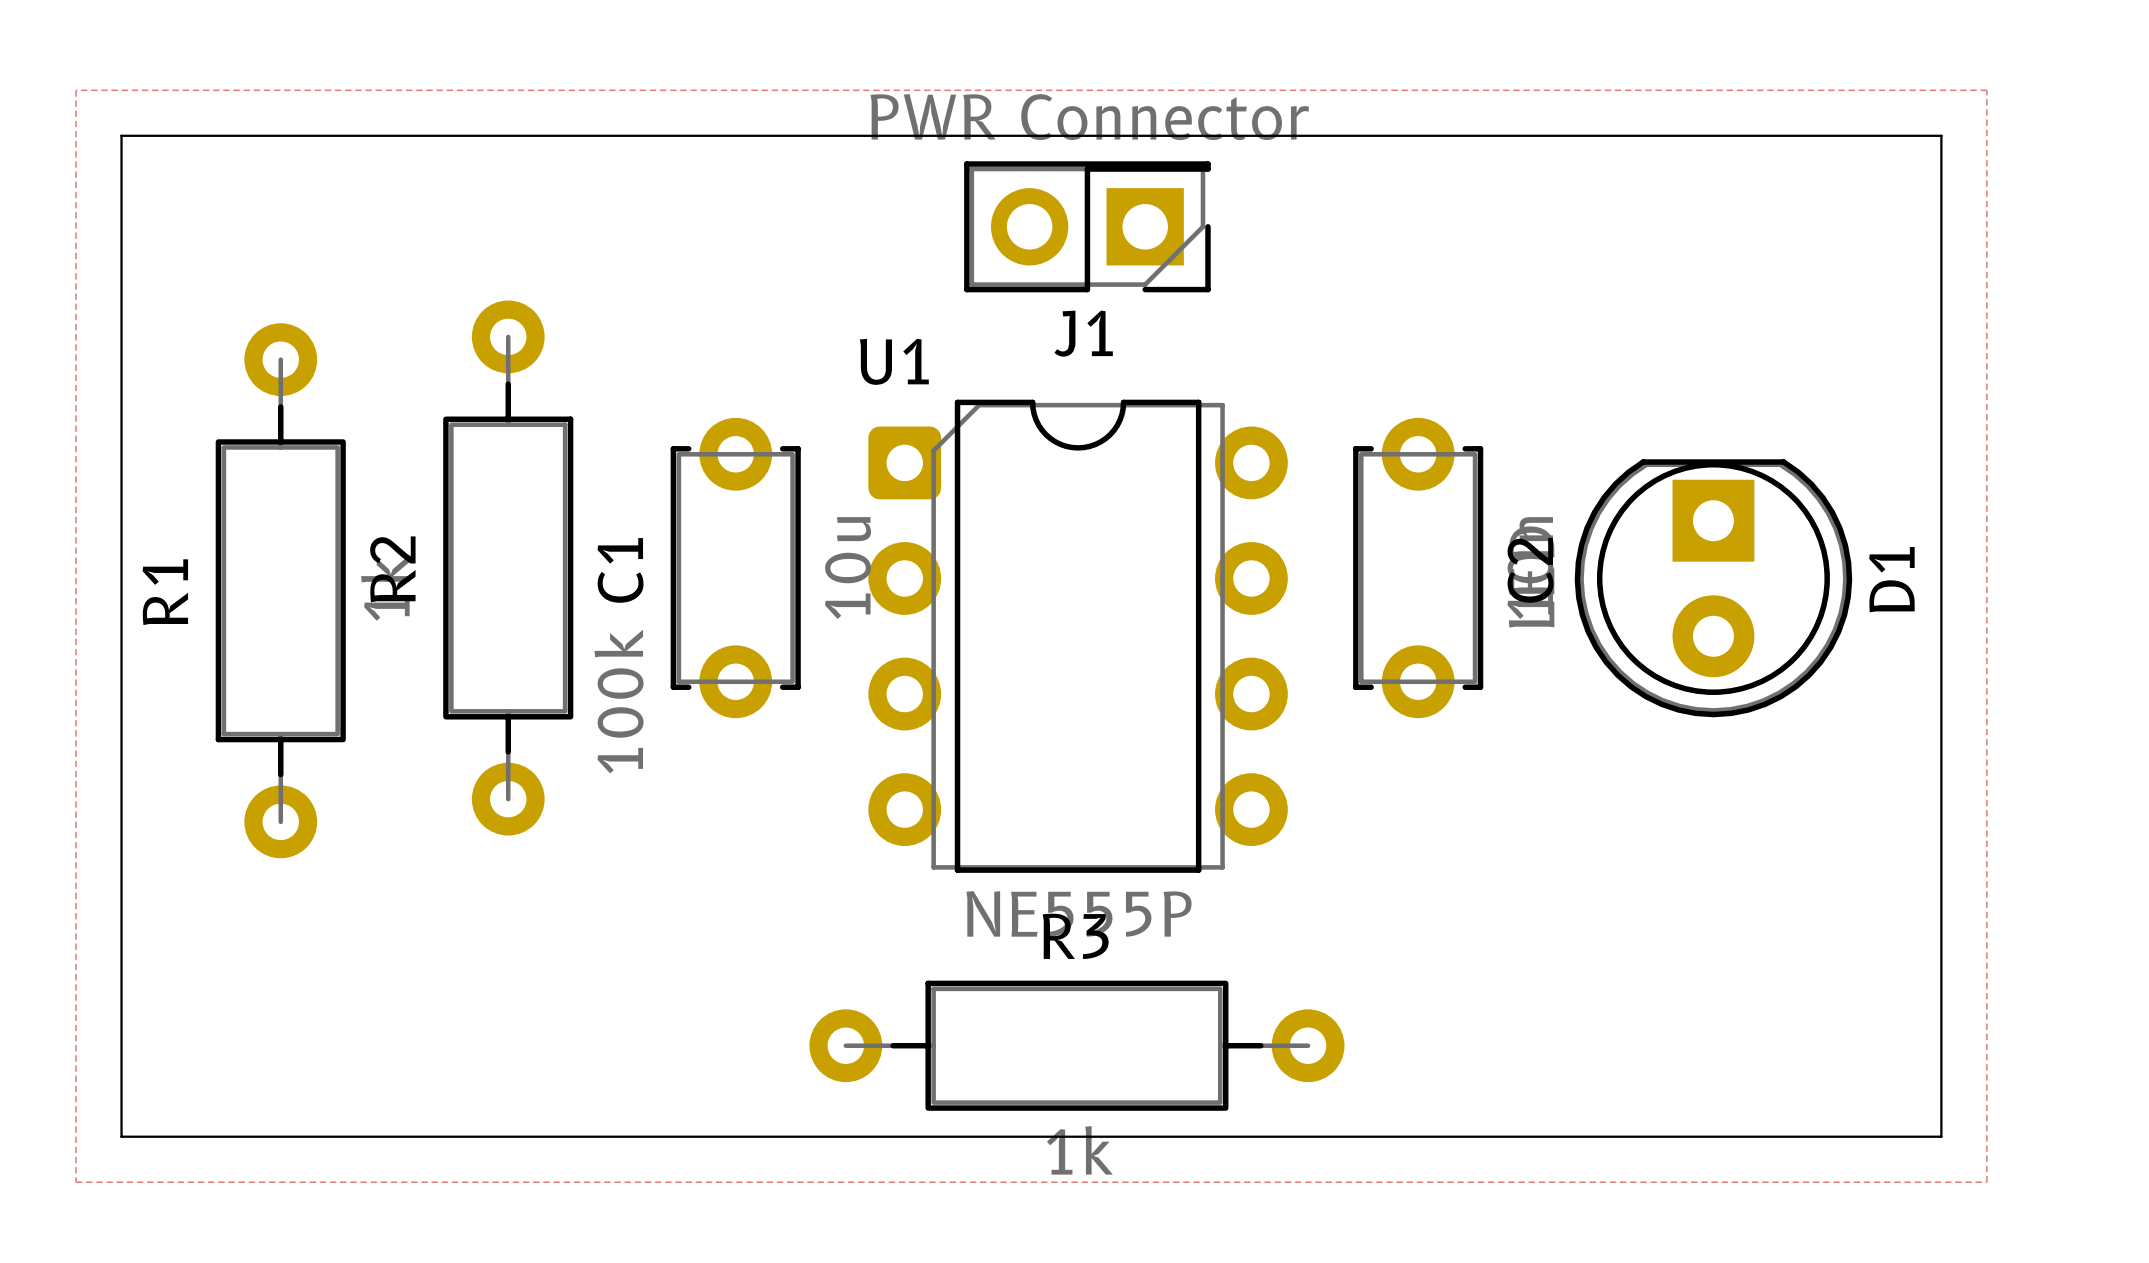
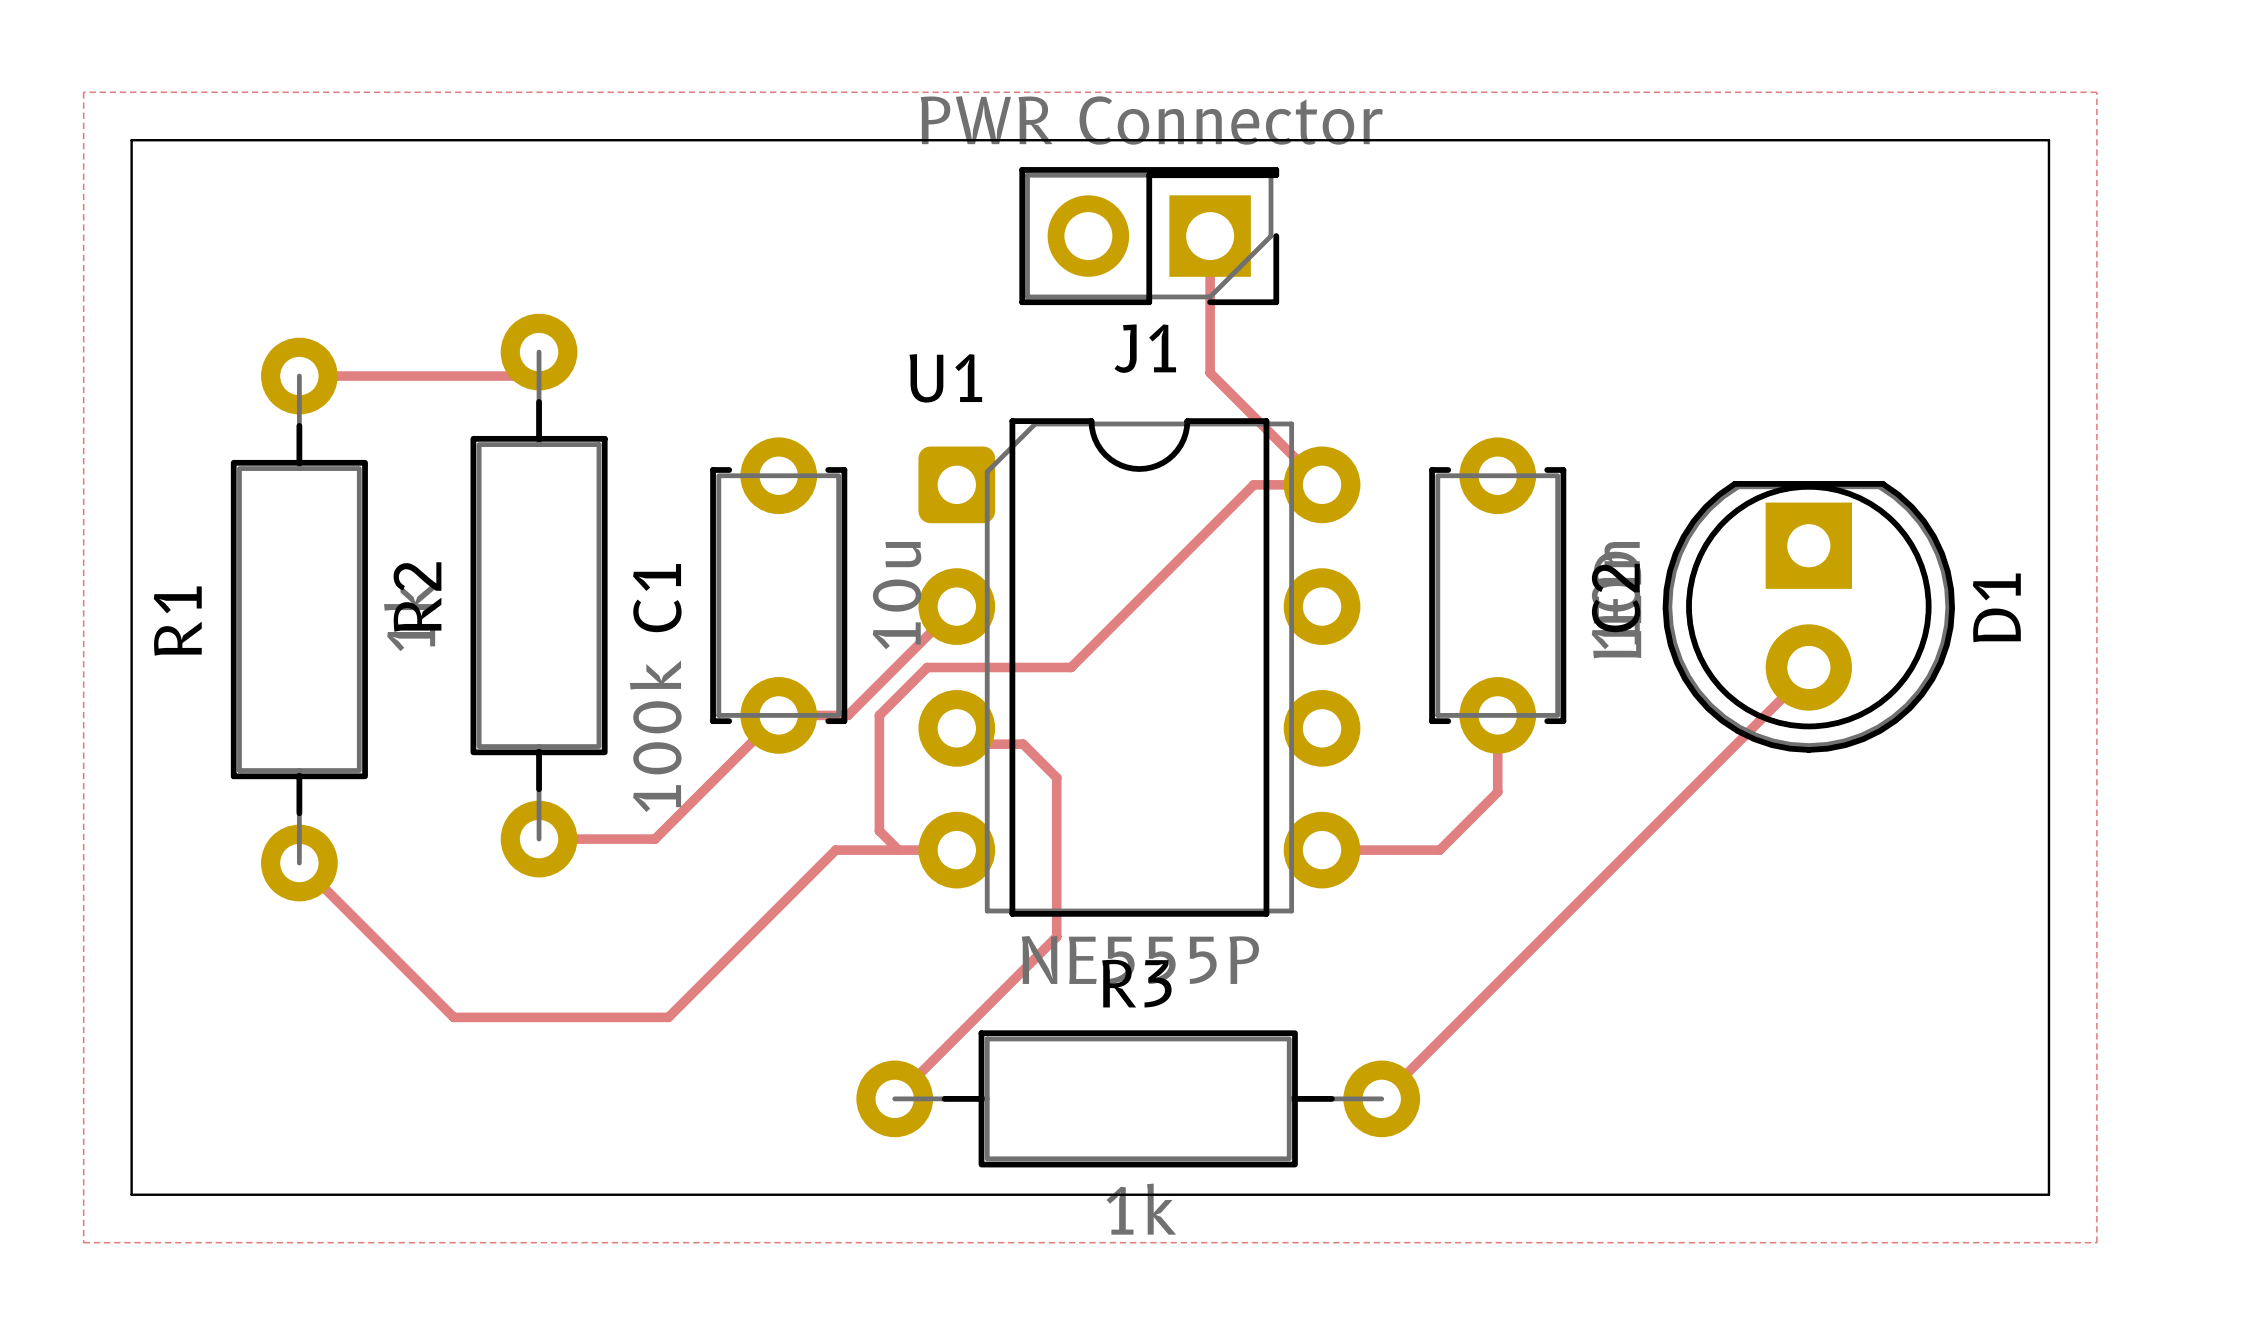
track: none -> (1210, 236) (1210, 372) (1322, 484) (1253, 484) (1071, 667) (927, 667) (879, 715) (879, 830) (898, 850)
track: none -> (539, 352) (515, 376) (299, 376)
track: none -> (956, 606) (847, 715) (778, 715) (655, 839) (539, 839)
track: none -> (1808, 667) (1808, 671) (1381, 1098)
track: none -> (1497, 715) (1497, 792) (1439, 850) (1322, 850)
track: none -> (956, 728) (972, 744) (1023, 744) (1056, 777) (1056, 936) (894, 1098)
track: none -> (956, 850) (835, 850) (668, 1017) (453, 1017) (299, 863)

